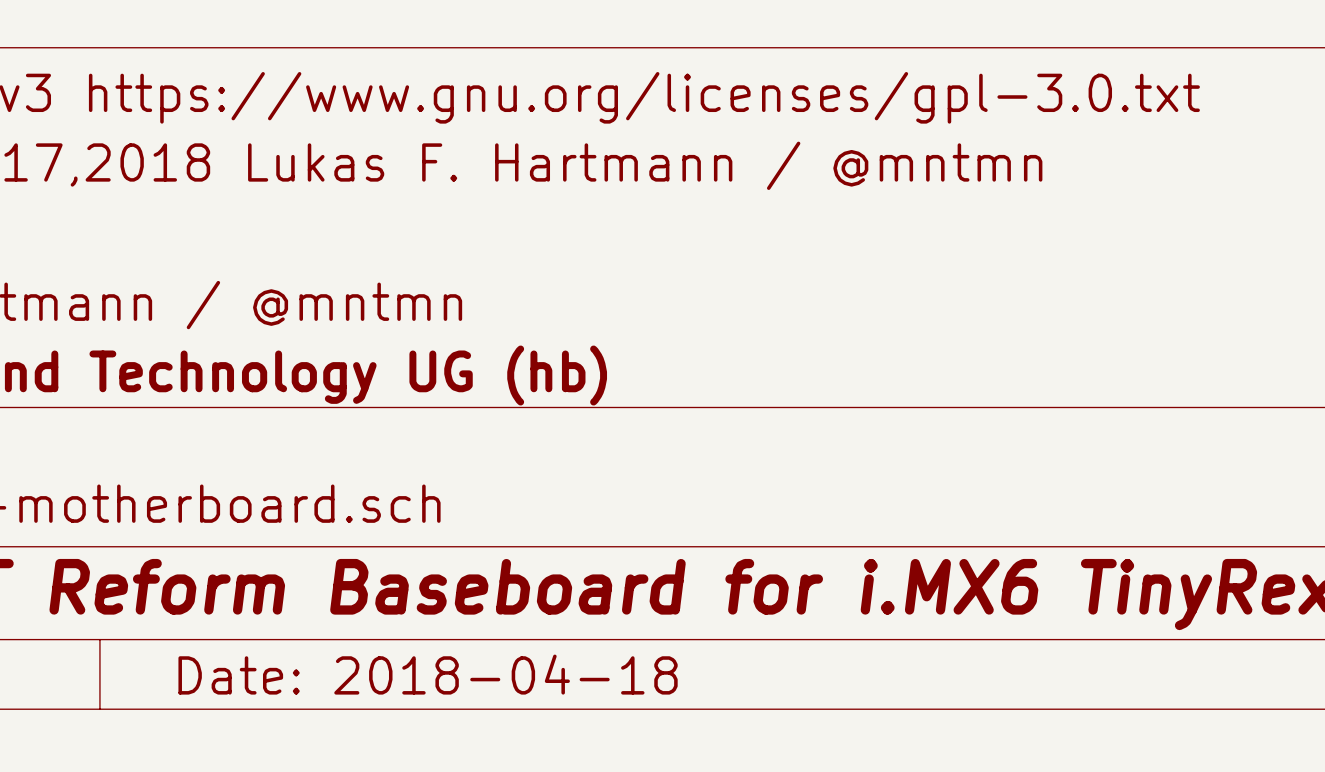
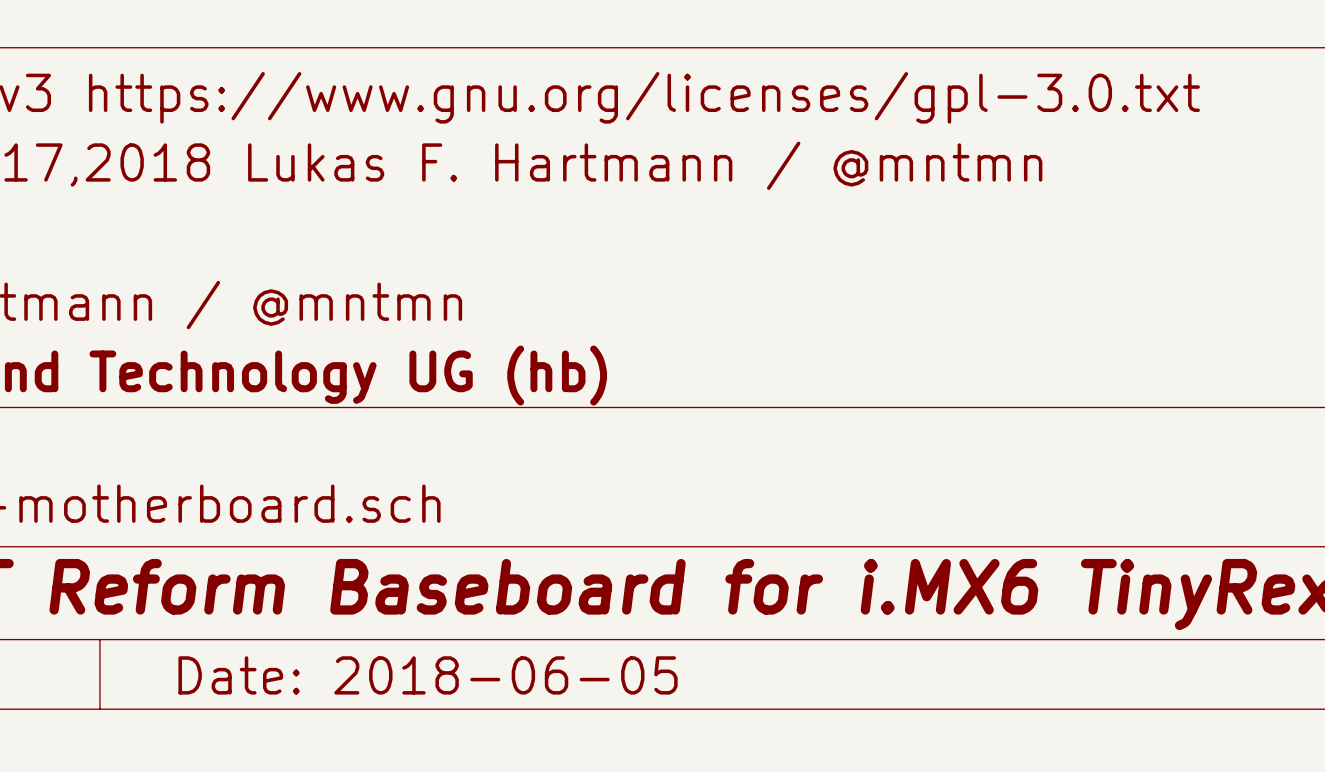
title block: Date: 2018-04-18 (428, 674) -> Date: 2018-06-05 (428, 675)

